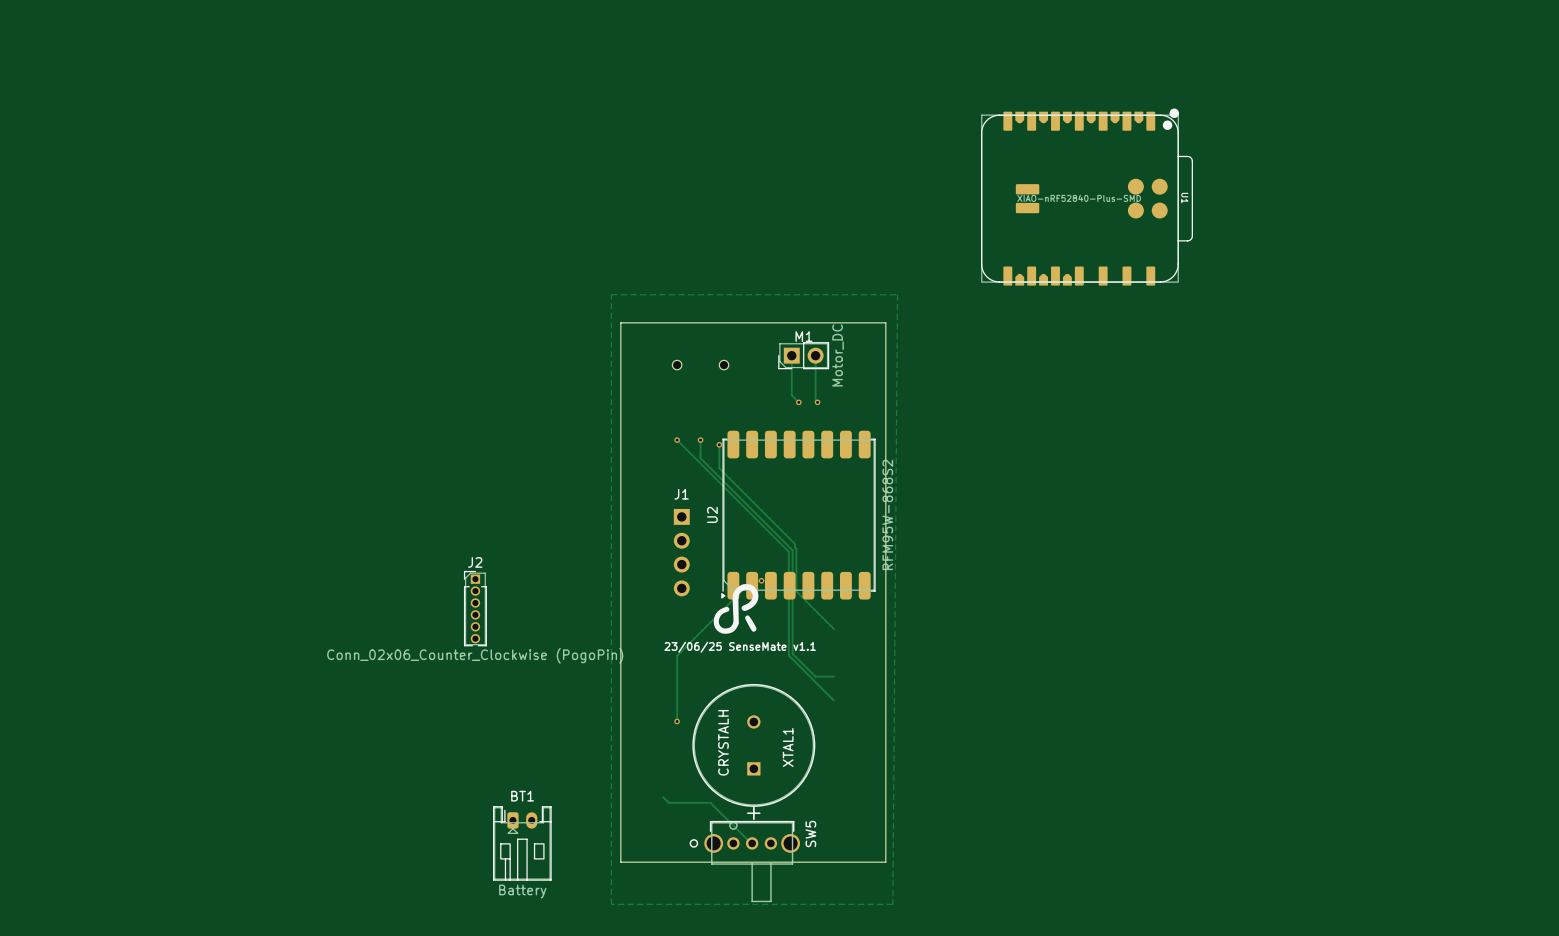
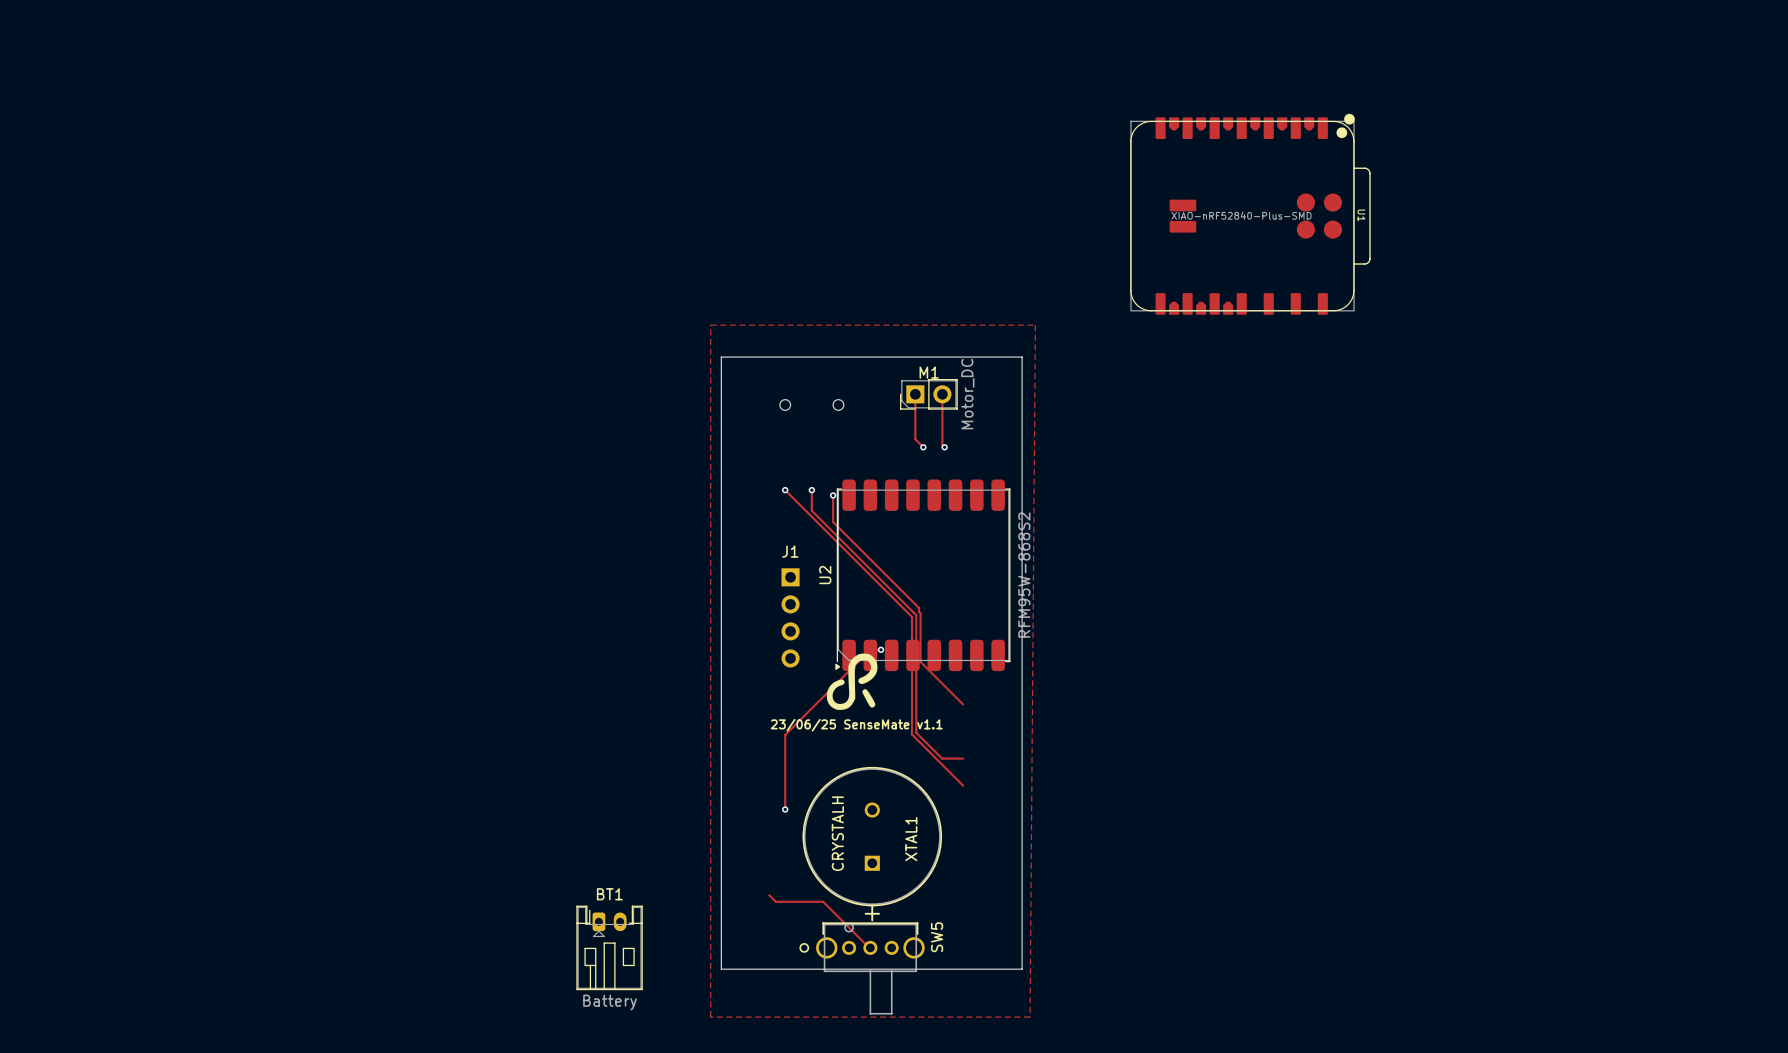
J2: Conn_02x06_Counter_Clockwise (PogoPin) (475, 608) -> none

